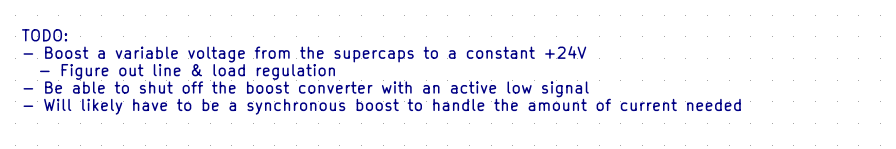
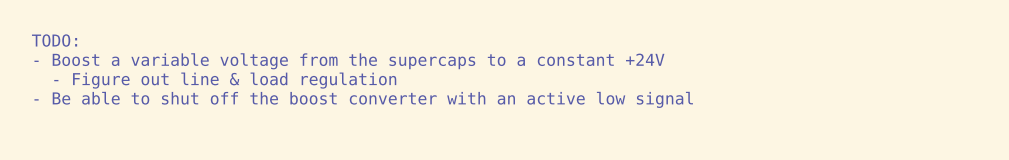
text: - Will likely have to be a synchronous boost to handle the amount of current needed (382, 106) -> none

